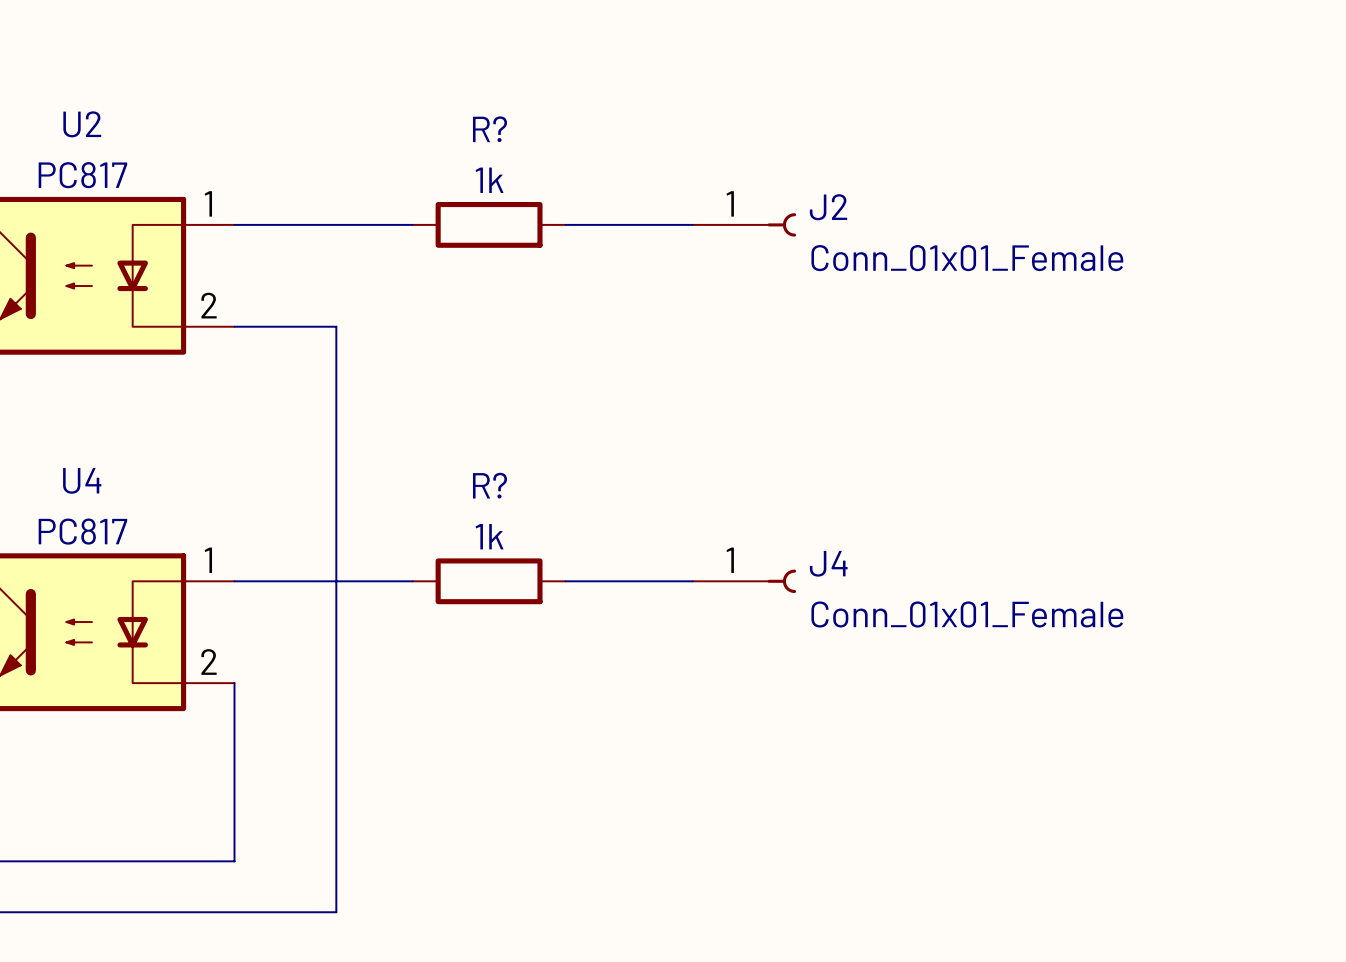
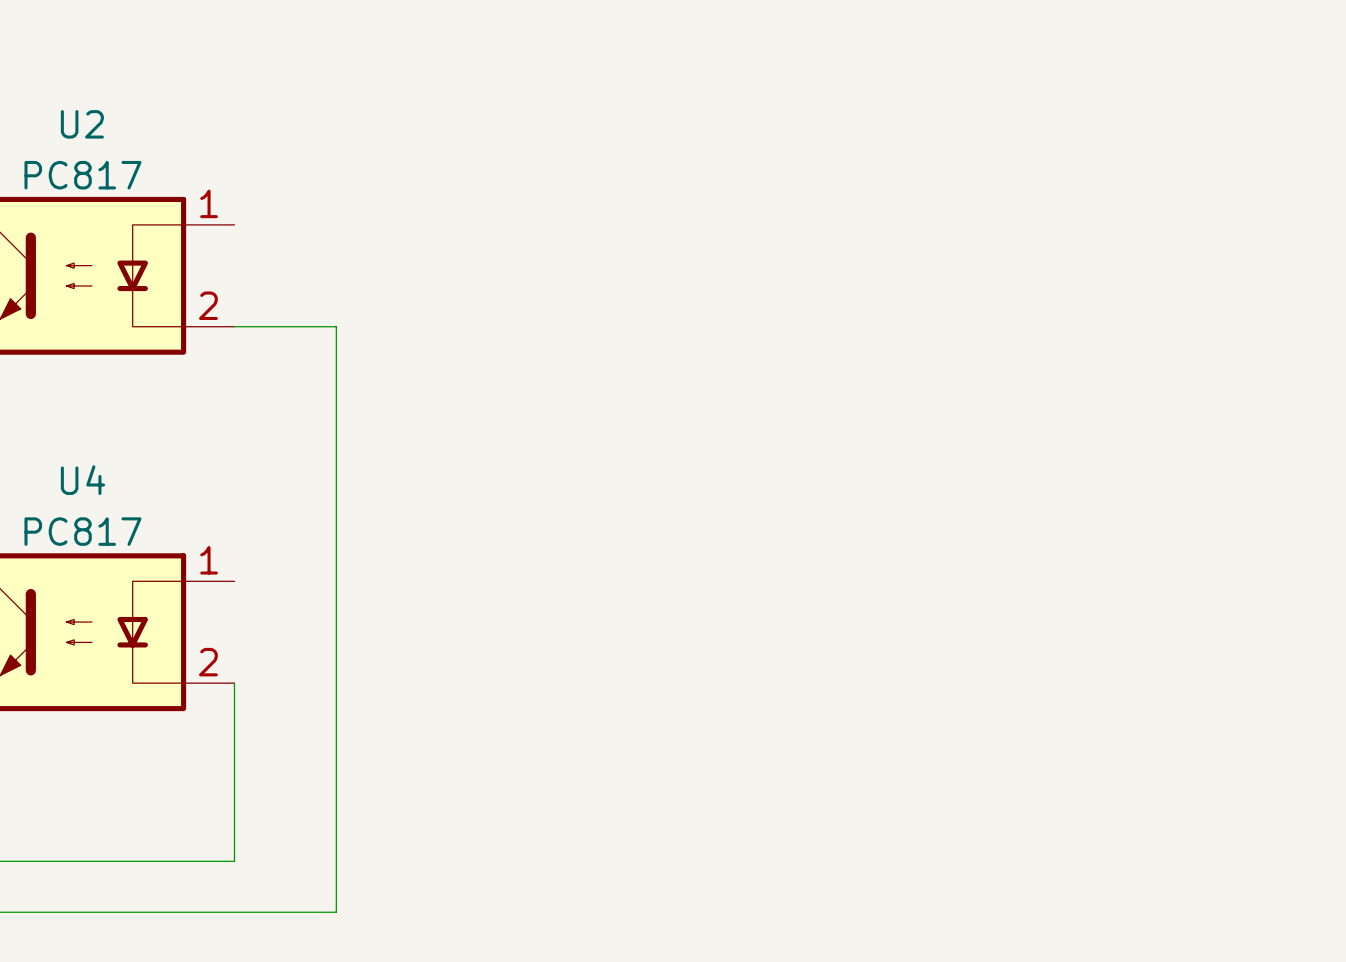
wire: (234, 224) (412, 224) -> none
R?: 1k (489, 224) -> none
wire: (565, 224) (692, 224) -> none
J2: Conn_01x01_Female (744, 224) -> none
wire: (234, 581) (412, 581) -> none
R?: 1k (489, 581) -> none
wire: (565, 581) (692, 581) -> none
J4: Conn_01x01_Female (744, 581) -> none

